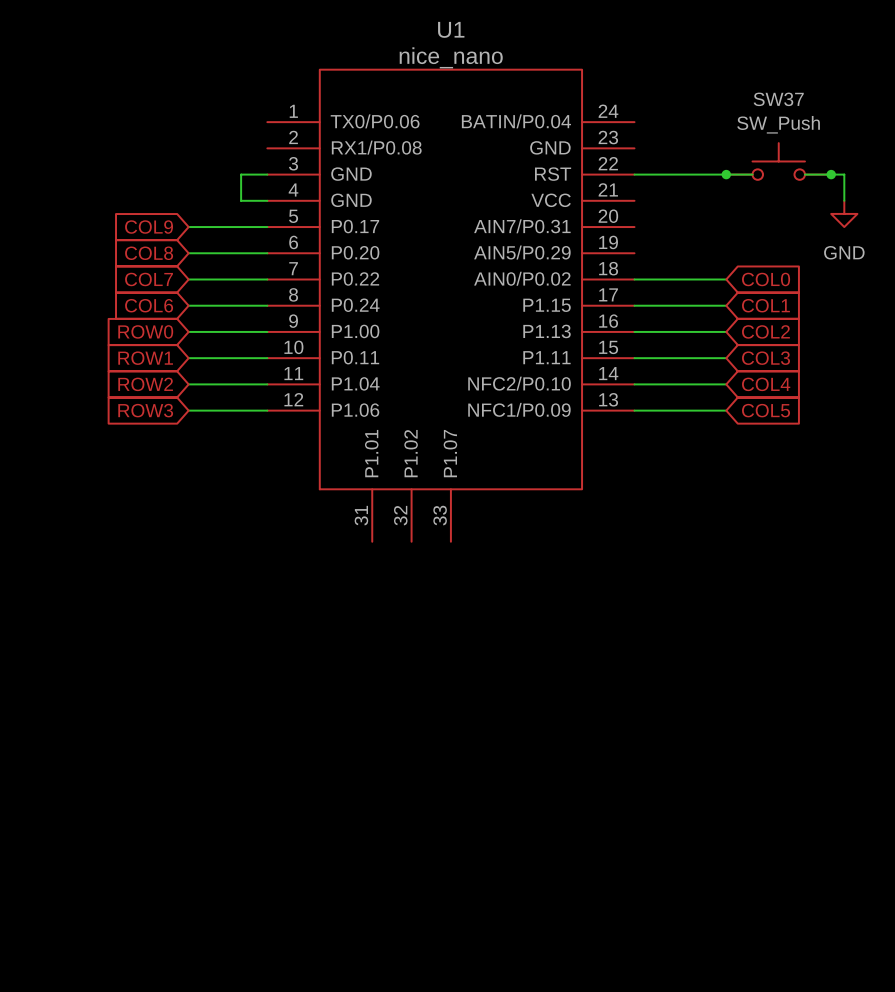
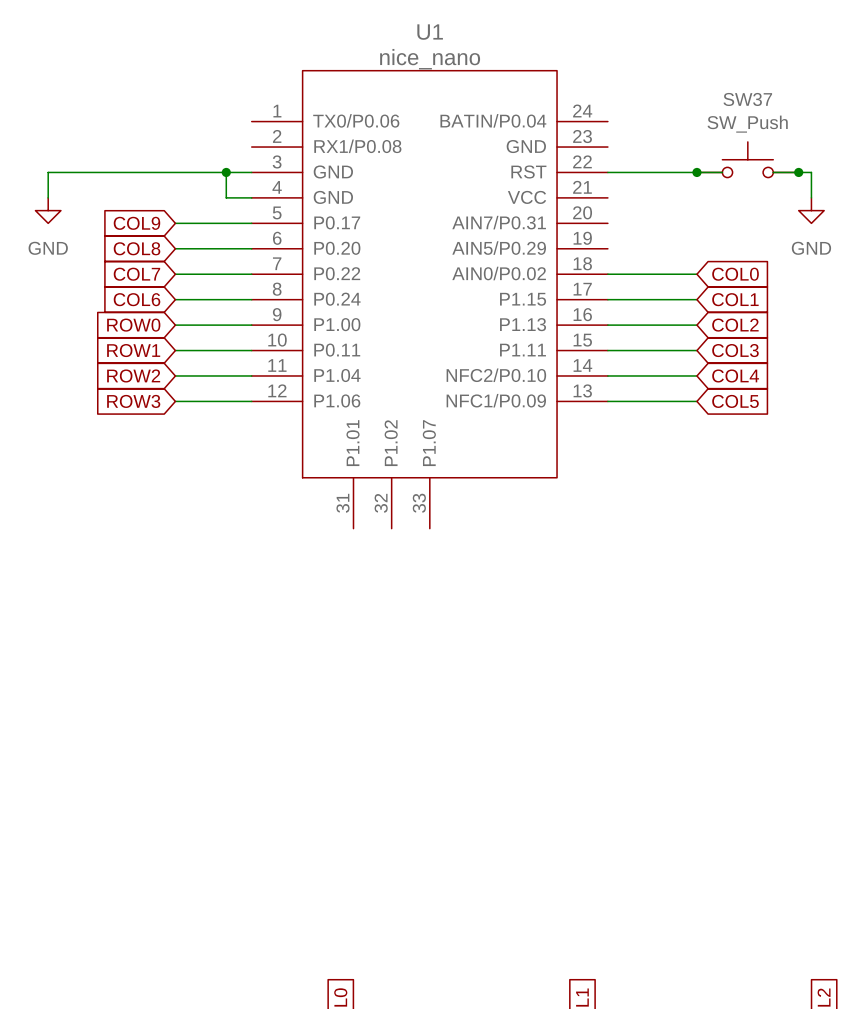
wire: none -> (226, 172) (48, 172) (48, 197)
junction: none -> (226, 172)
power symbol: none -> GND (48, 210)

